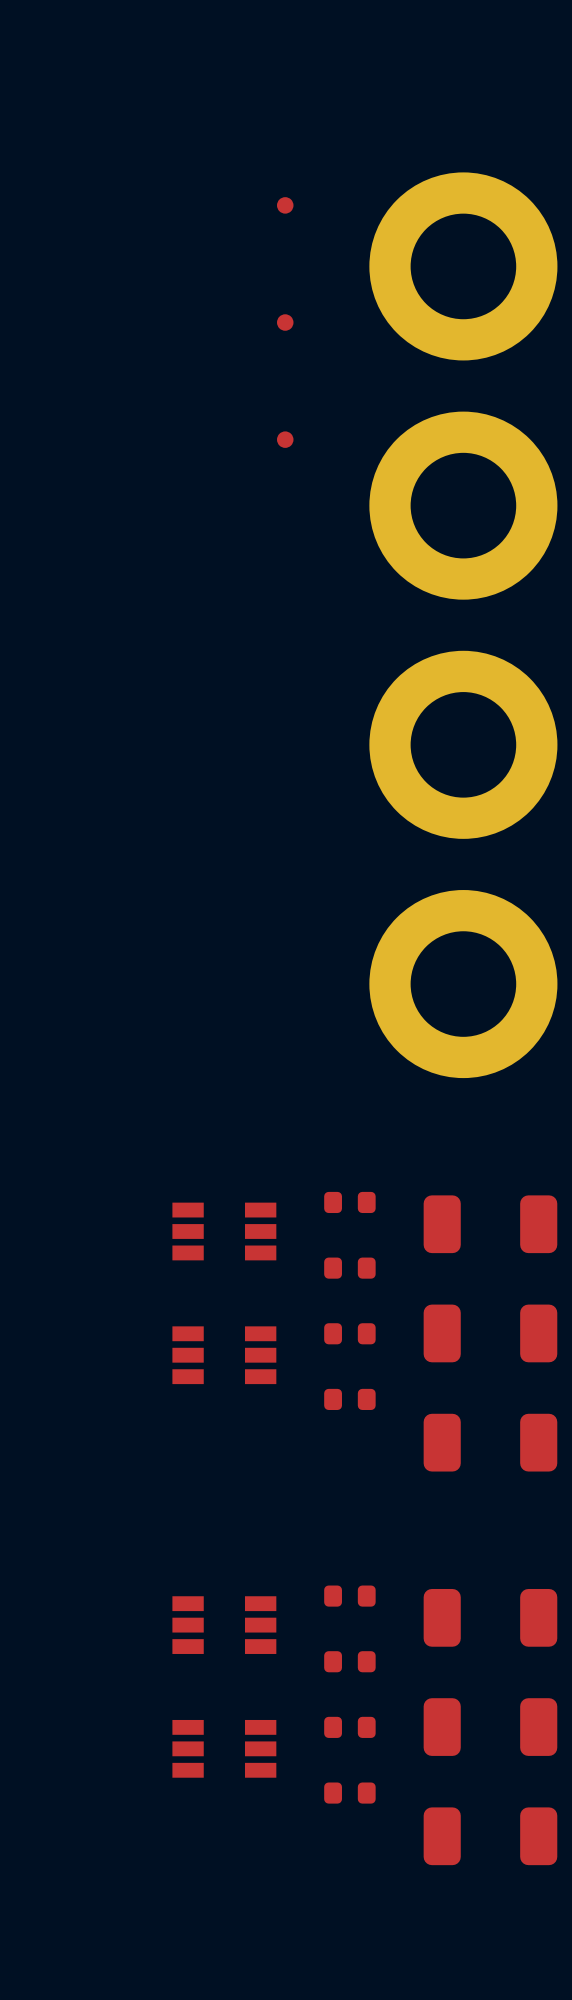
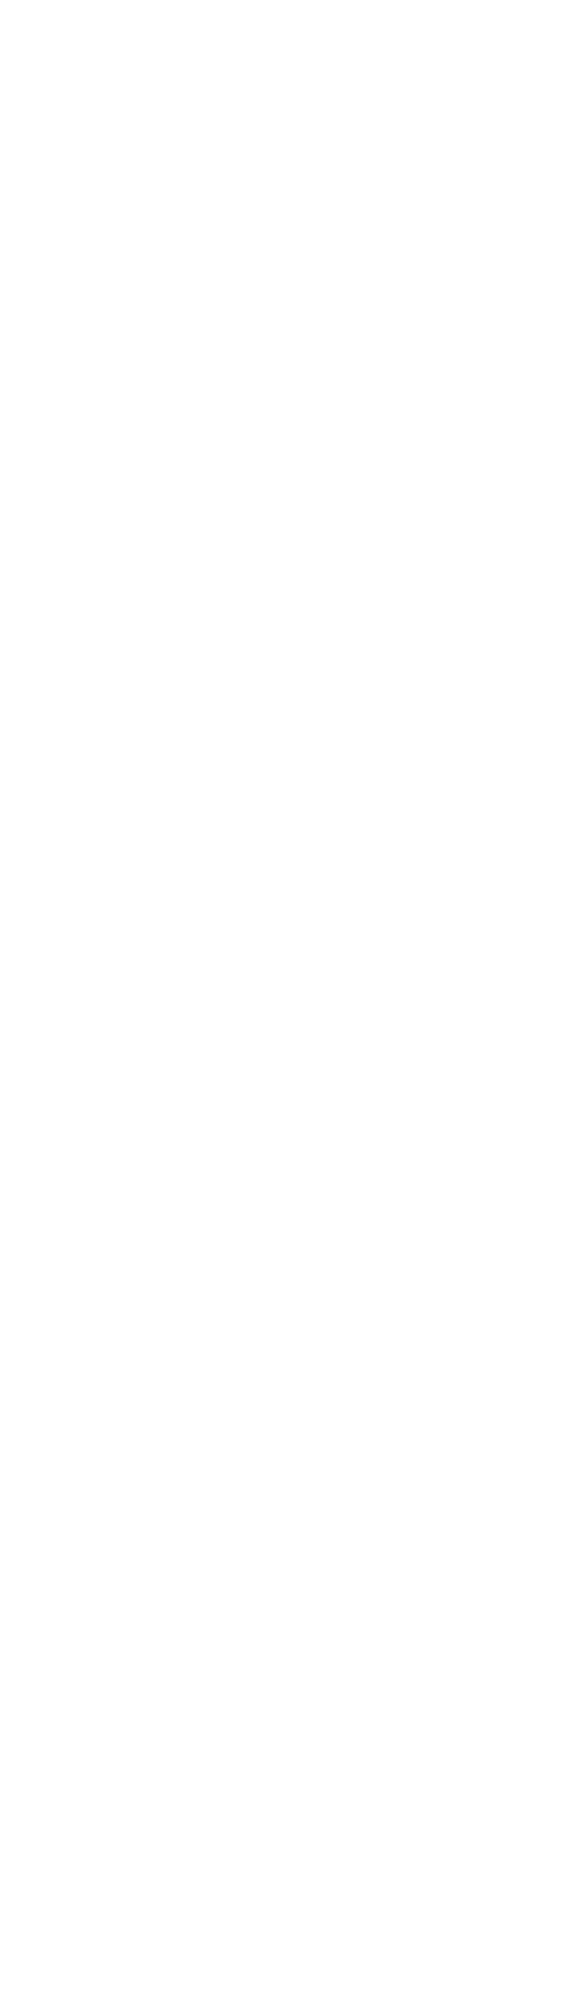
part: (285, 205) -> none
part: (463, 266) -> none
part: (285, 322) -> none
part: (285, 439) -> none
part: (463, 505) -> none
part: (463, 744) -> none
part: (463, 984) -> none
part: (349, 1202) -> none
part: (490, 1224) -> none
part: (224, 1231) -> none
part: (349, 1268) -> none
part: (349, 1333) -> none
part: (490, 1333) -> none
part: (224, 1355) -> none
part: (349, 1399) -> none
part: (490, 1442) -> none
part: (349, 1596) -> none
part: (490, 1617) -> none
part: (224, 1625) -> none
part: (349, 1661) -> none
part: (349, 1727) -> none
part: (490, 1727) -> none
part: (224, 1748) -> none
part: (349, 1793) -> none
part: (490, 1836) -> none

